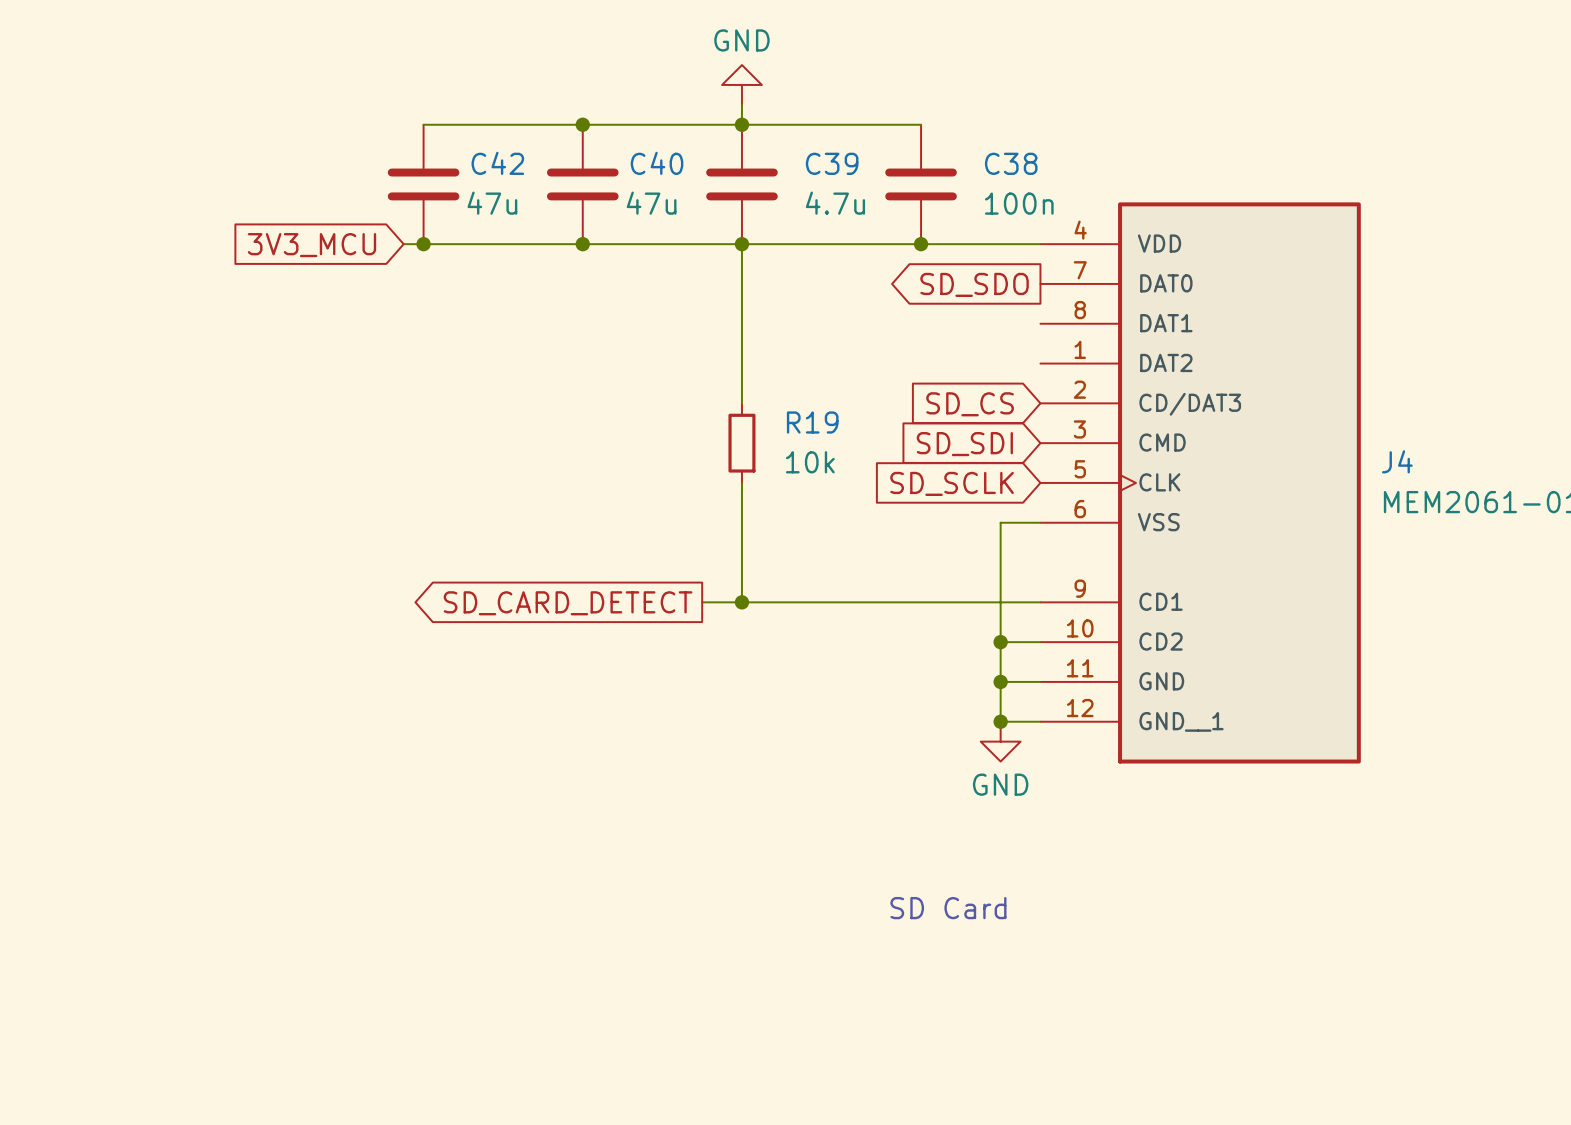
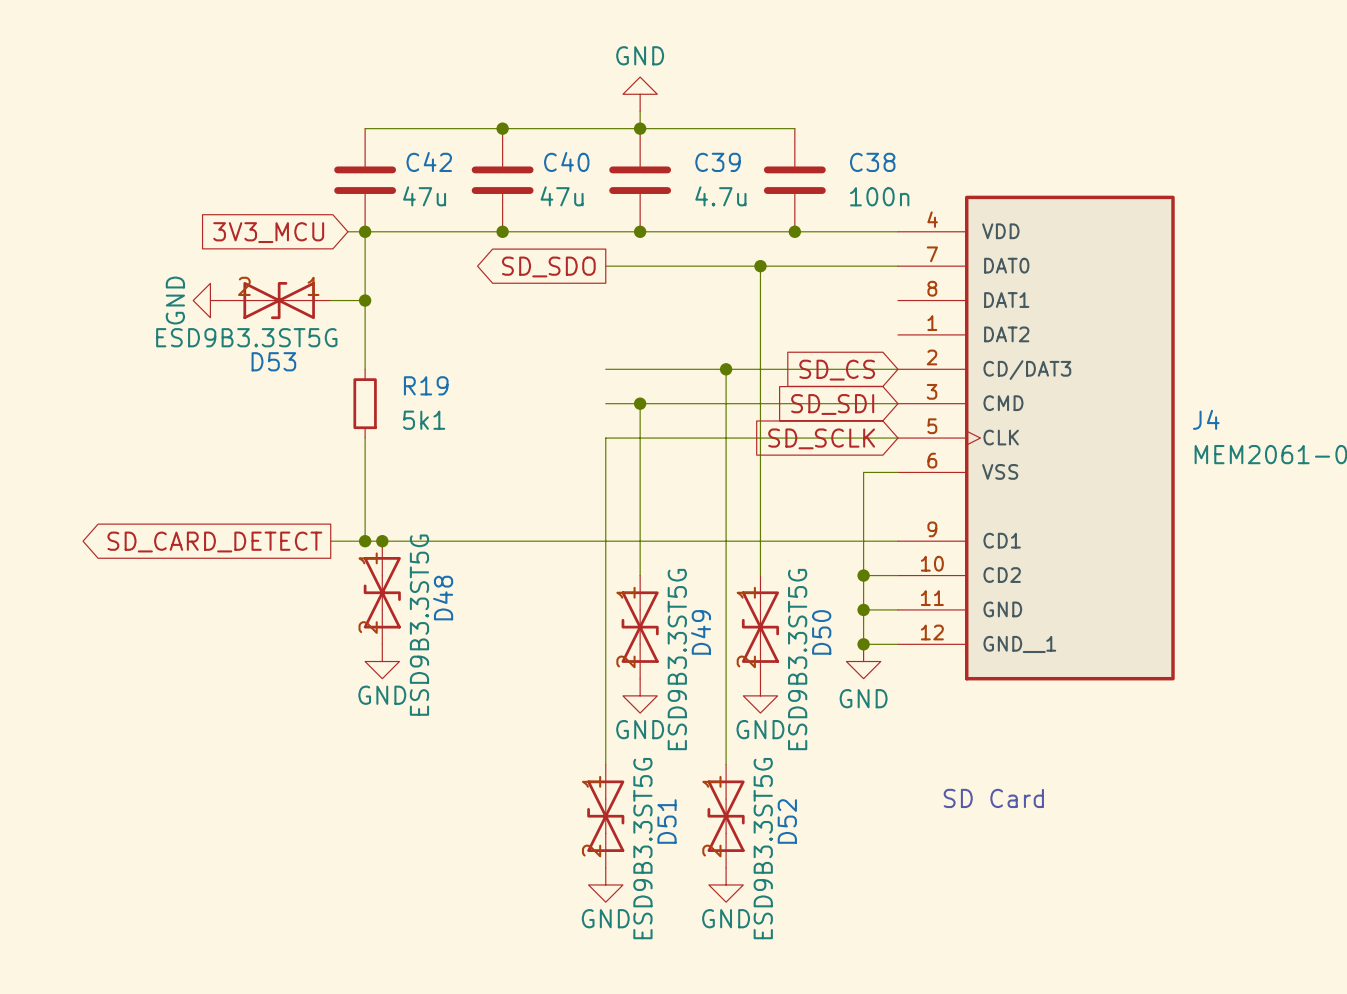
wire: (741, 244) (741, 403) -> (365, 231) (365, 369)
wire: none -> (605, 266) (897, 266)
wire: none -> (760, 266) (760, 575)
junction: none -> (760, 266)
global label position: SD_SDO (974, 284) -> SD_SDO (548, 266)
power symbol: none -> GND (210, 300)
D53: none -> ESD9B3.3ST5G (279, 300)
wire: none -> (330, 300) (365, 300)
junction: none -> (365, 300)
wire: none -> (605, 369) (897, 369)
wire: none -> (726, 369) (726, 764)
junction: none -> (726, 369)
wire: none -> (605, 403) (897, 403)
wire: none -> (640, 403) (640, 438)
junction: none -> (640, 403)
R19 position: (741, 443) -> (365, 403)
R19 value: 10k (810, 462) -> 5k1 (424, 420)
wire: none -> (365, 438) (365, 541)
wire: none -> (897, 438) (605, 438) (605, 764)
wire: none -> (330, 541) (605, 541)
junction: none -> (365, 541)
junction: none -> (382, 541)
wire: none -> (640, 541) (640, 575)
junction: (741, 602) -> none
global label position: SD_CARD_DETECT (568, 603) -> SD_CARD_DETECT (214, 542)
D48: none -> ESD9B3.3ST5G (382, 592)
D49: none -> ESD9B3.3ST5G (640, 627)
D50: none -> ESD9B3.3ST5G (760, 627)
power symbol: none -> GND (382, 661)
power symbol: none -> GND (640, 695)
power symbol: none -> GND (760, 695)
text position: SD Card (948, 908) -> SD Card (993, 798)
D51: none -> ESD9B3.3ST5G (605, 816)
D52: none -> ESD9B3.3ST5G (726, 816)
power symbol: none -> GND (605, 884)
power symbol: none -> GND (726, 884)

